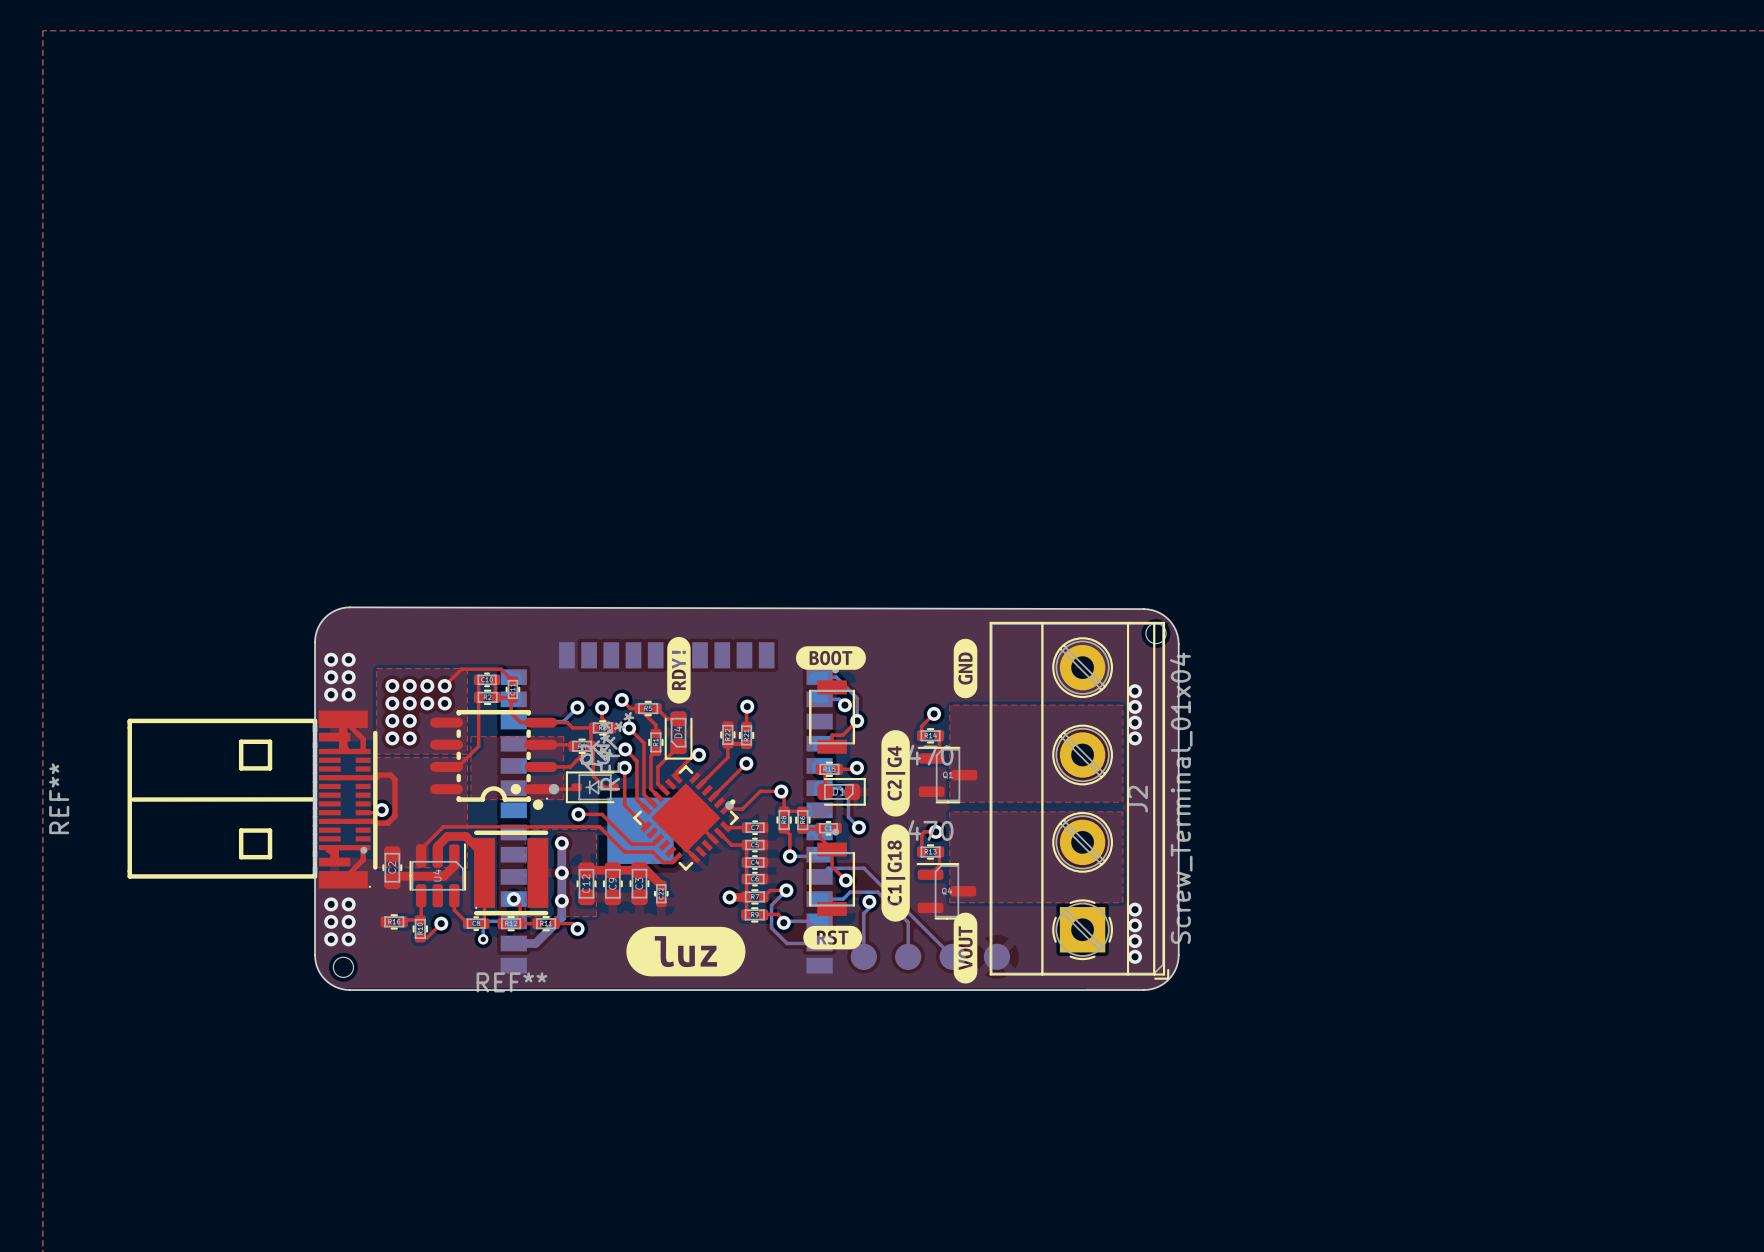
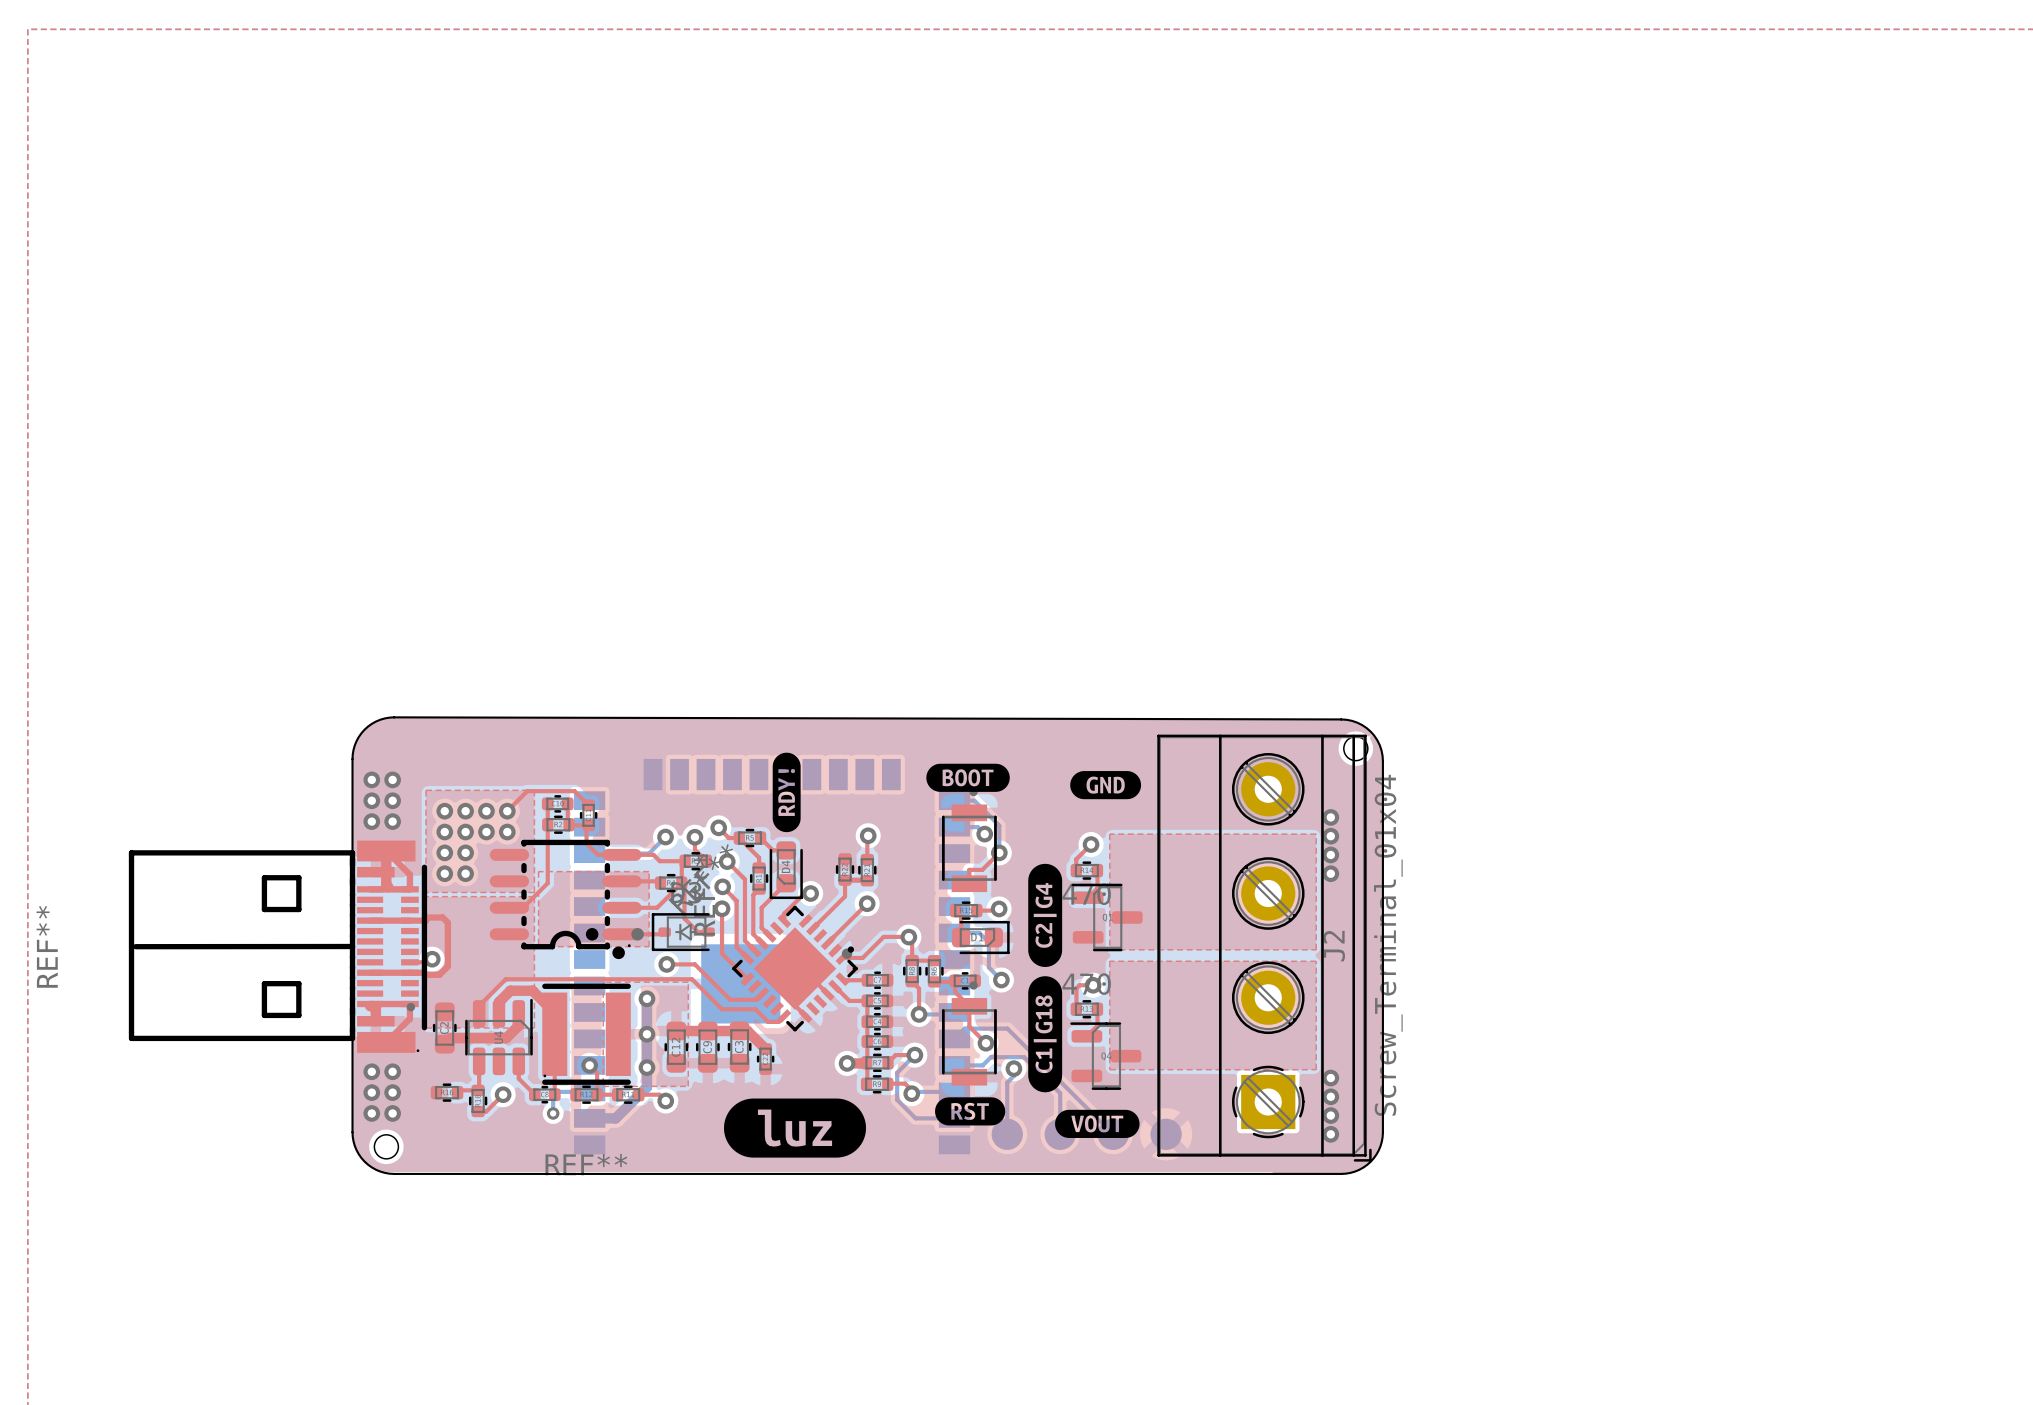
drawing: [953, 638, 978, 699] -> none
drawing: none -> [1070, 771, 1142, 800]
drawing: [953, 912, 978, 984] -> none
drawing: none -> [1055, 1109, 1140, 1138]

